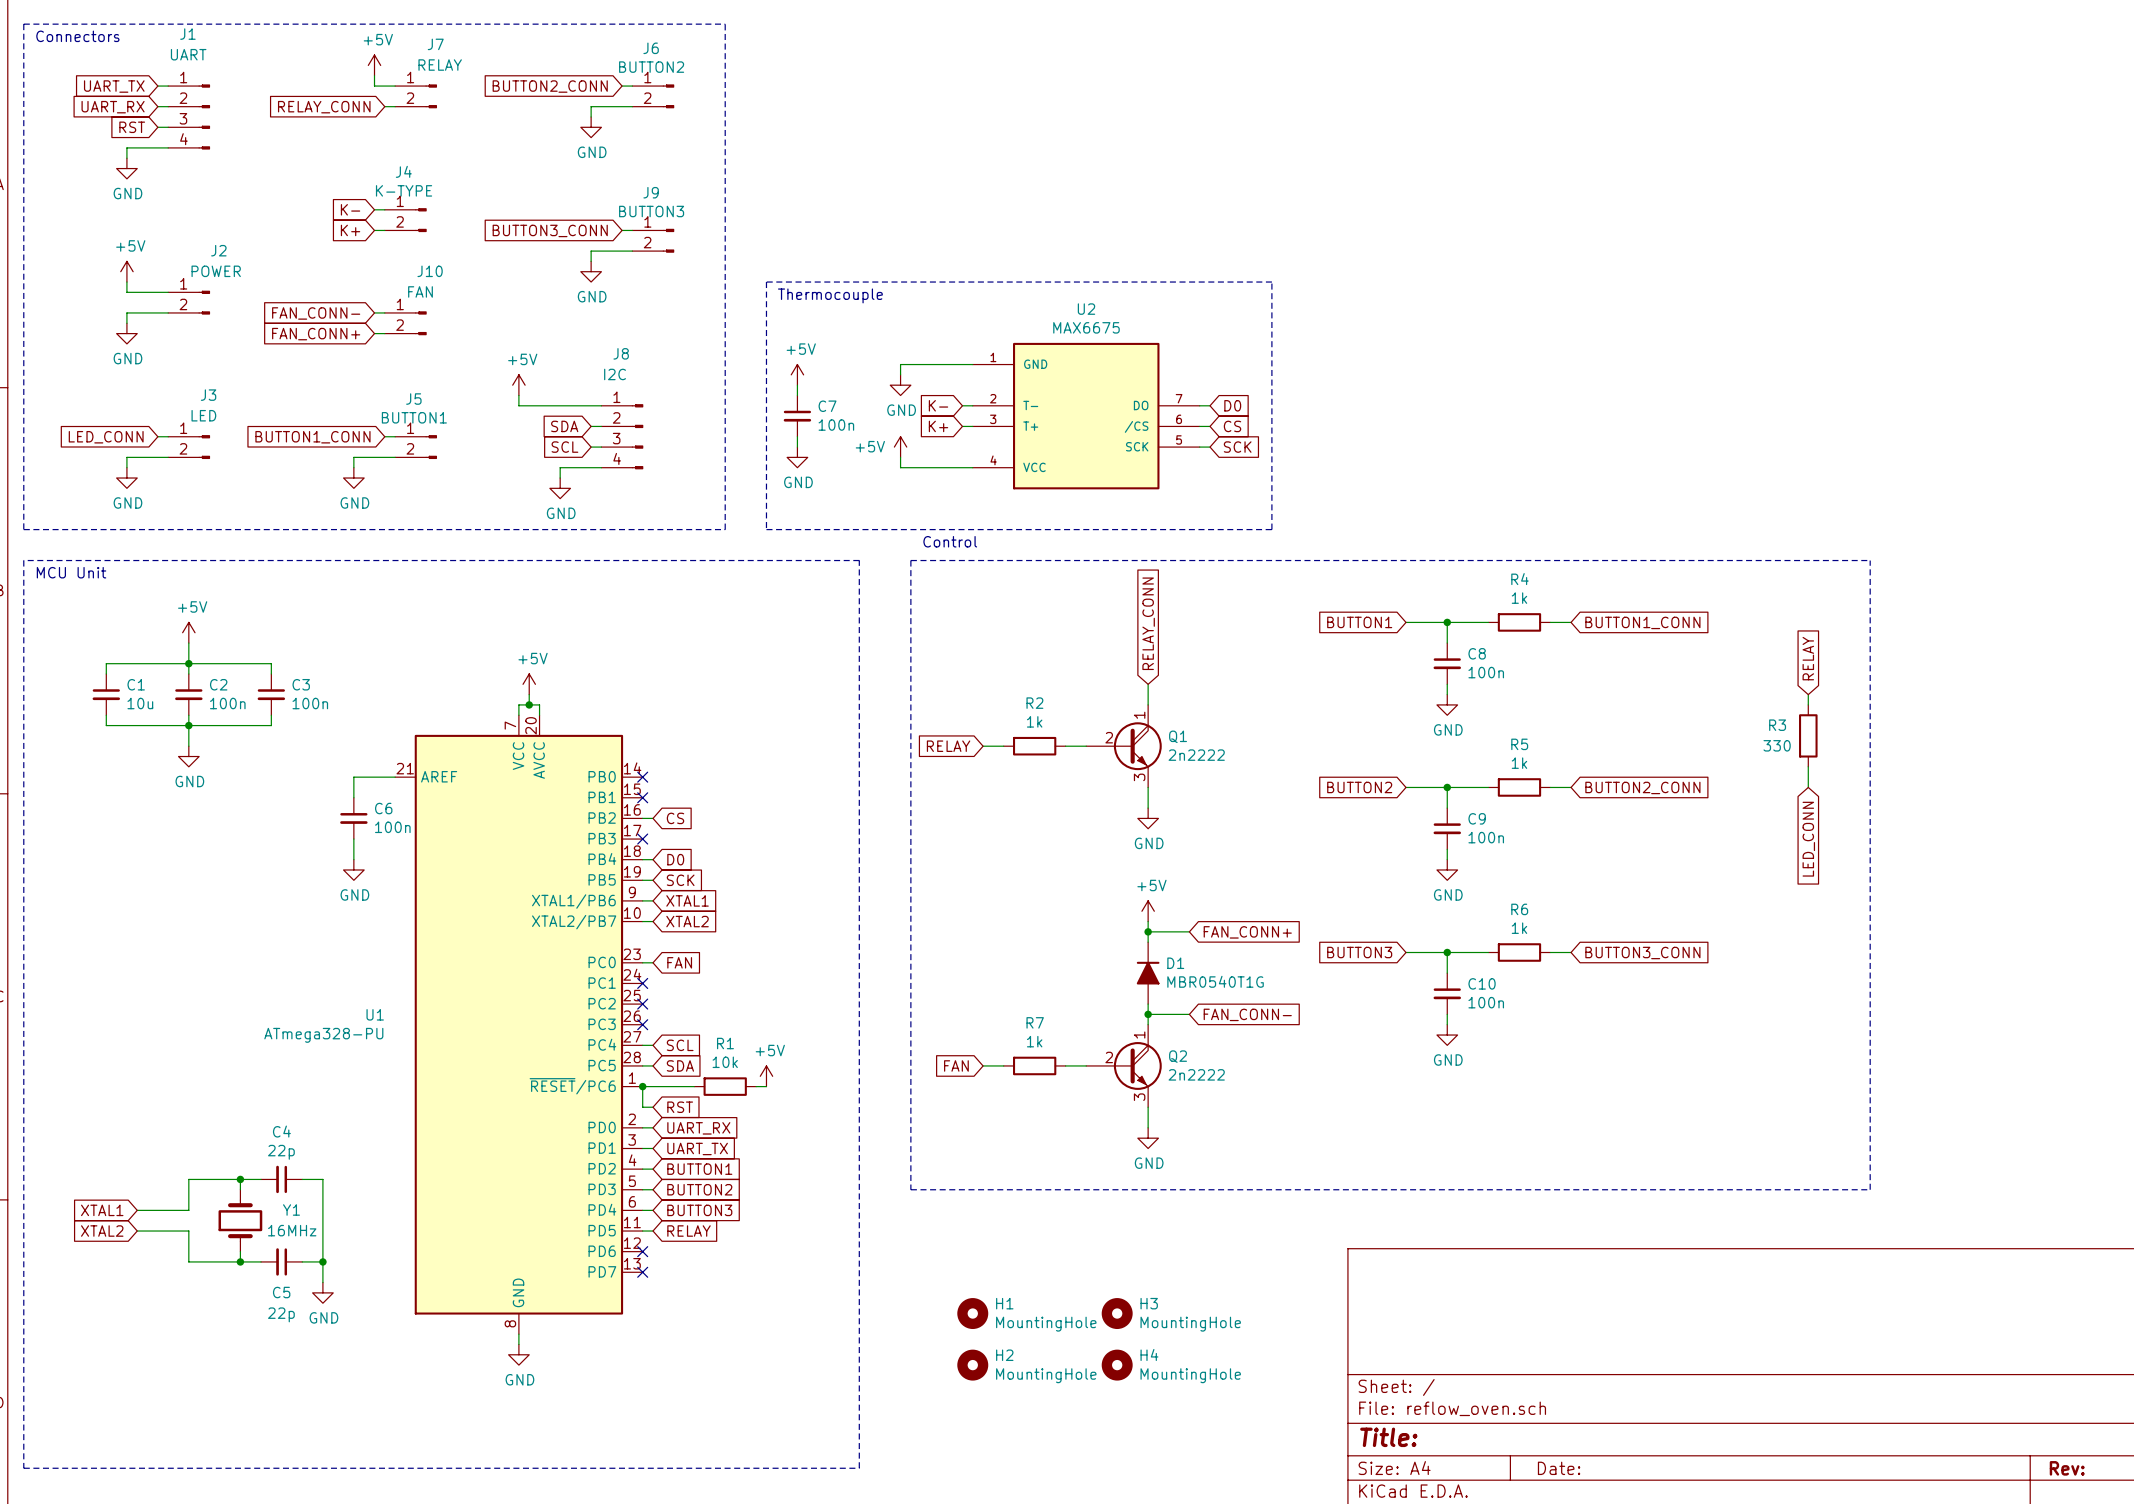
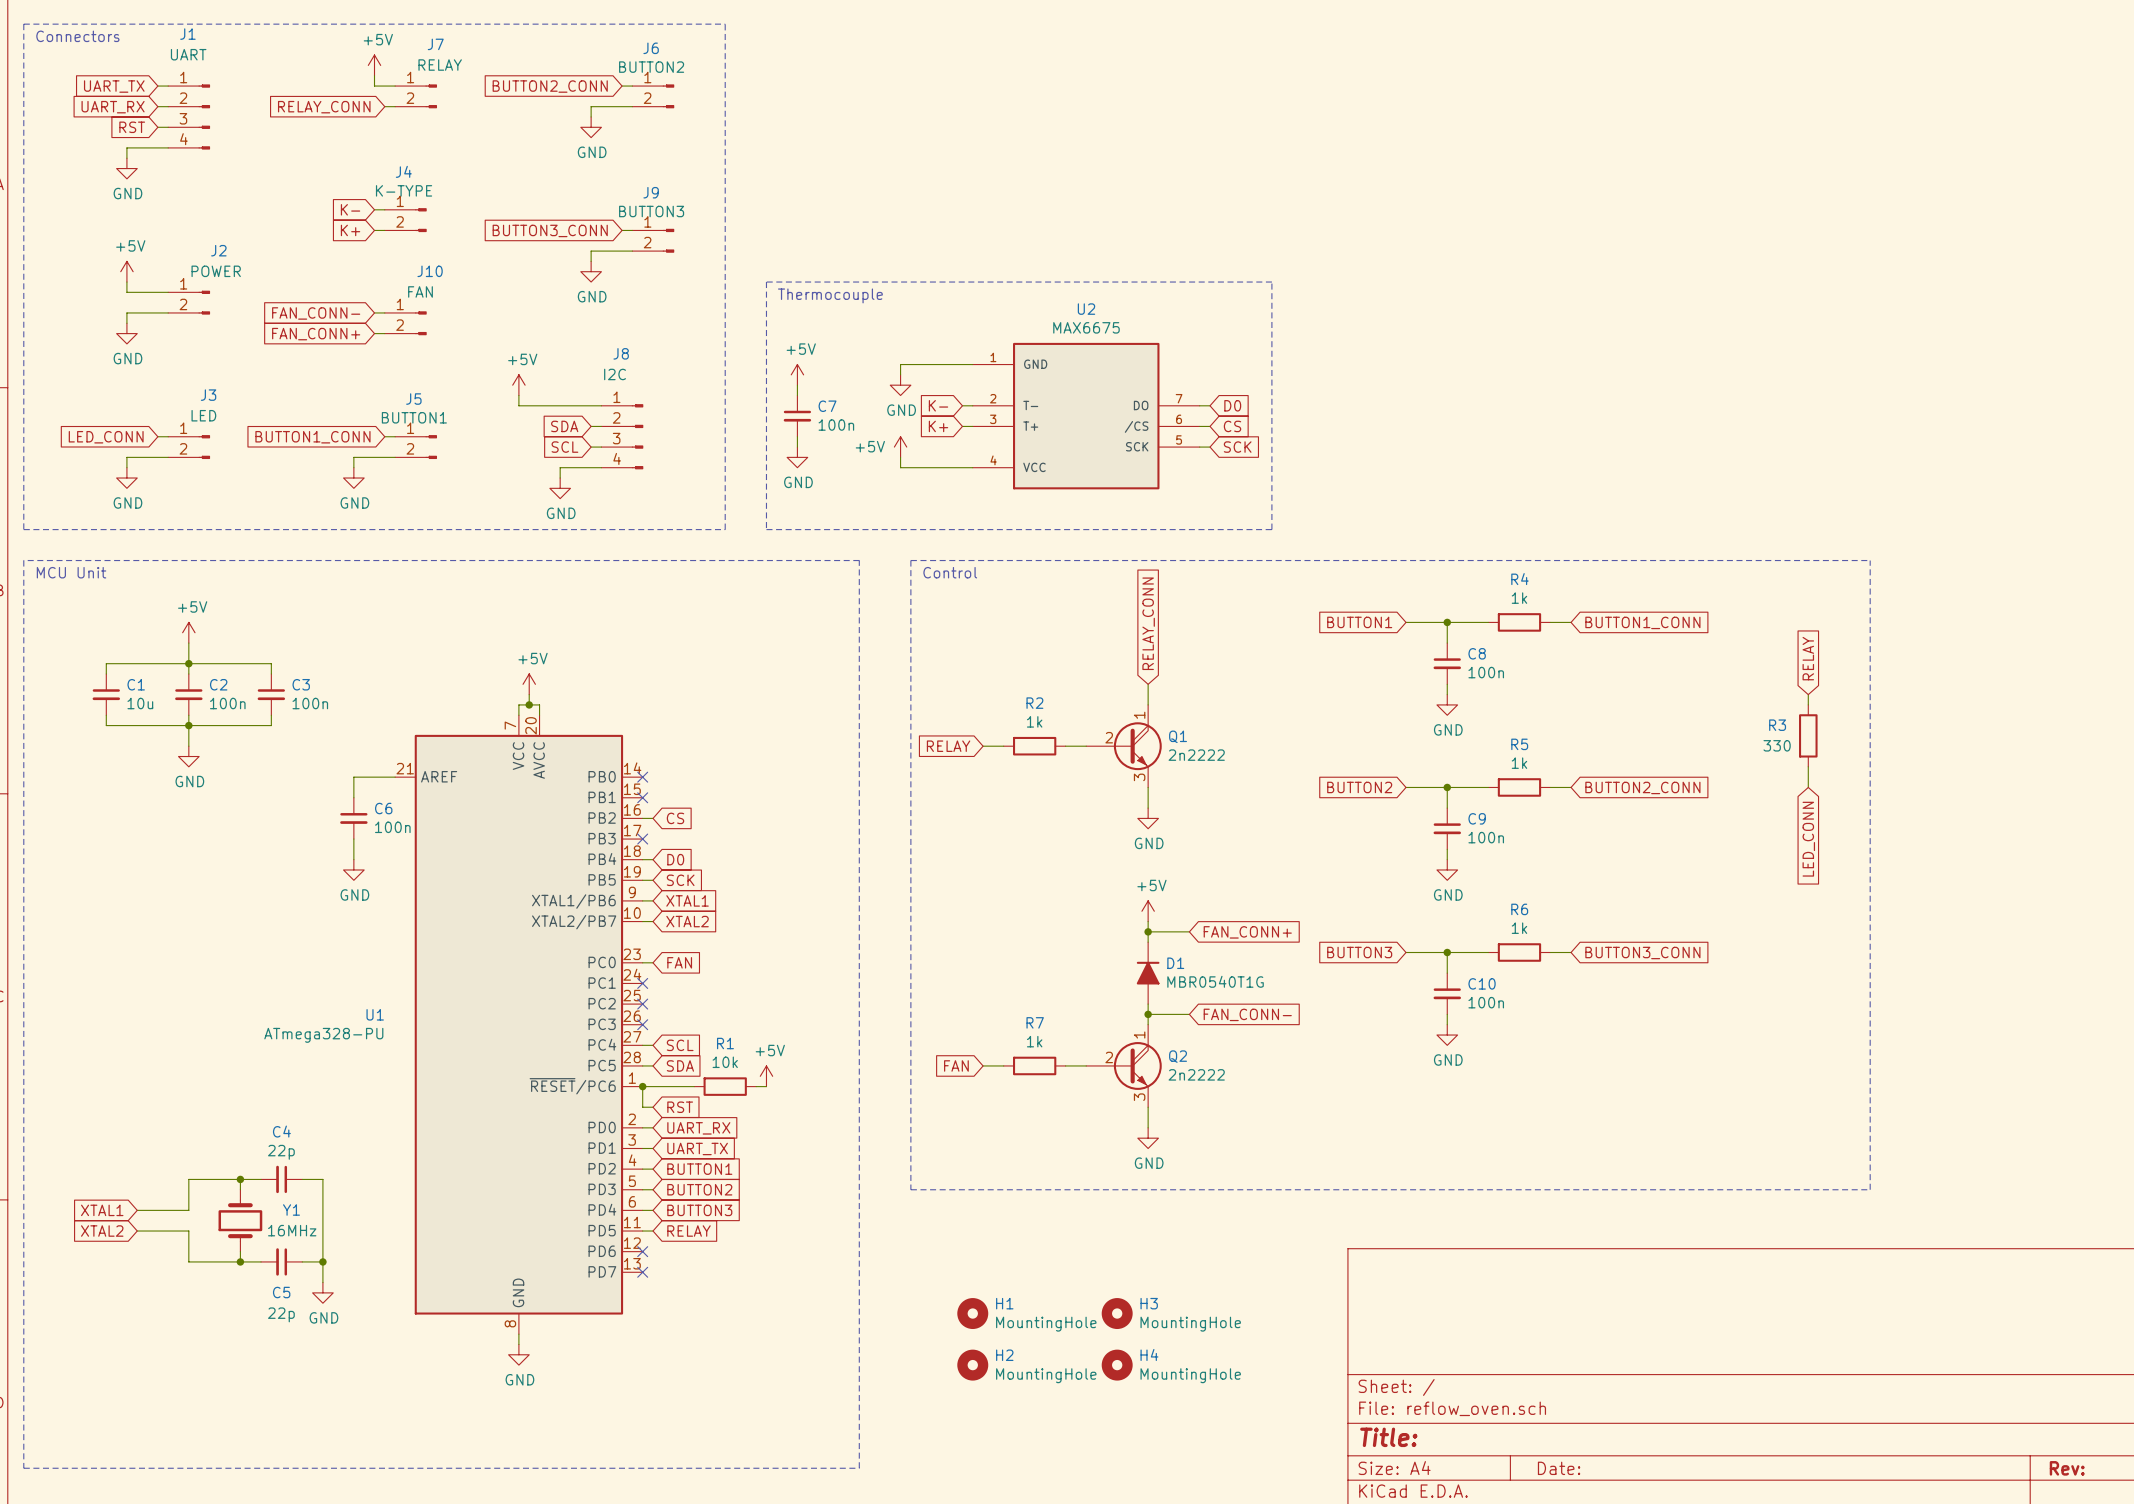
text position: Control (950, 541) -> Control (950, 572)

